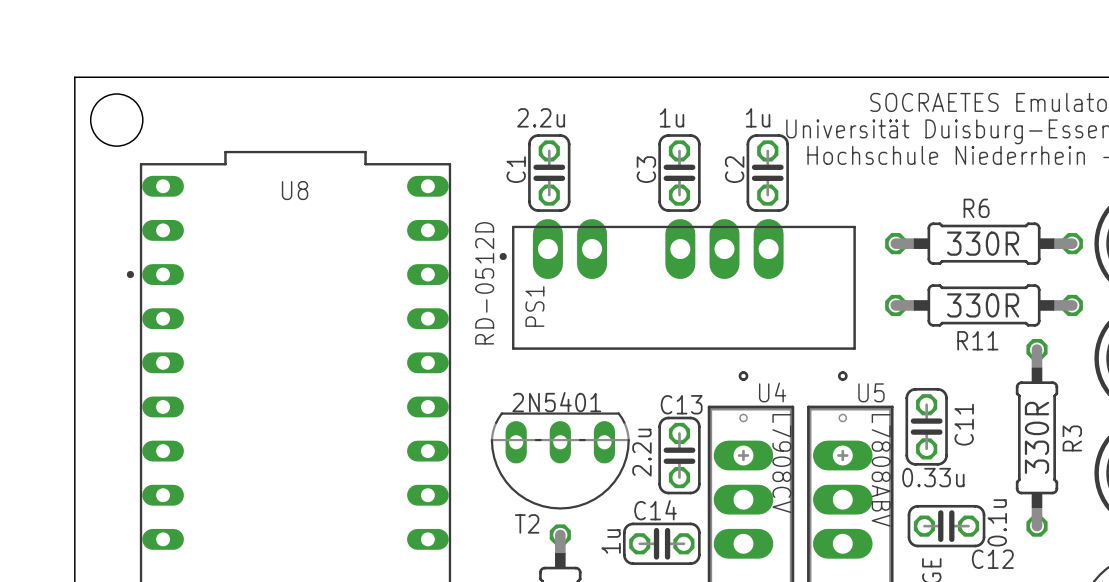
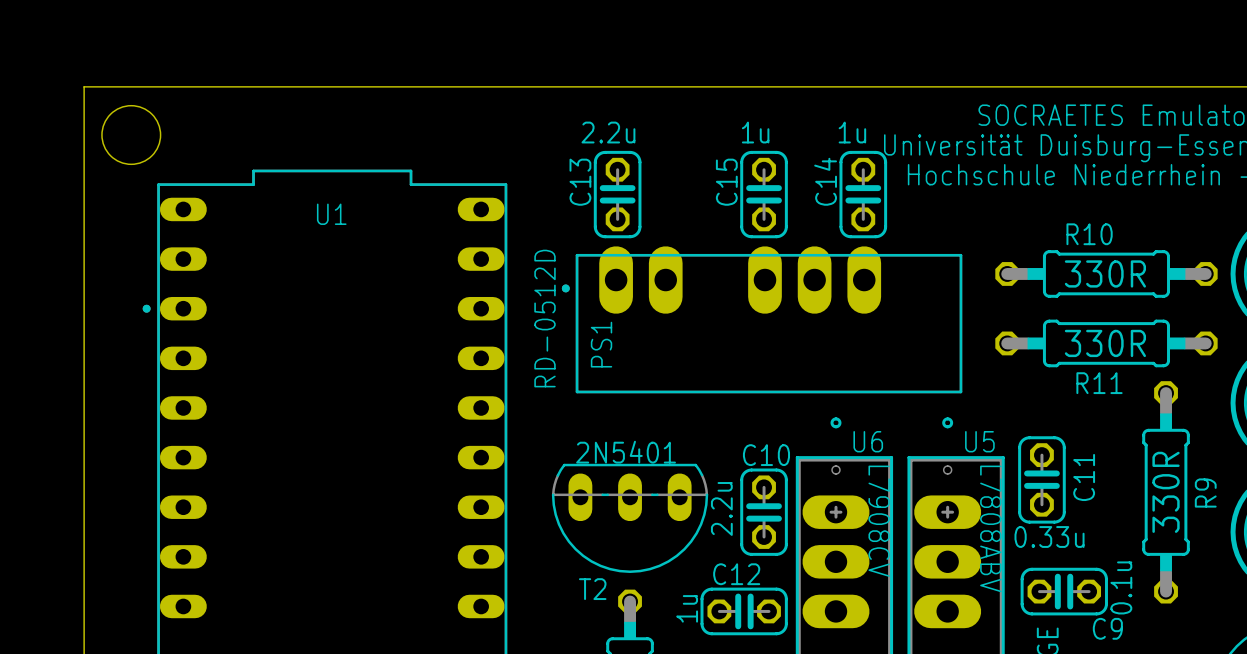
C1 name: C1 (516, 169) -> C13 (580, 182)
C3 name: C3 (646, 169) -> C15 (726, 182)
C2 name: C2 (734, 169) -> C14 (825, 181)
U8 name: U8 (295, 190) -> U1 (331, 214)
R6 name: R6 (976, 208) -> R10 (1089, 234)
U4 name: U4 (772, 392) -> U6 (868, 441)
C13 name: C13 (681, 404) -> C10 (766, 455)
R3 name: R3 (1072, 438) -> R9 (1205, 493)
C14 name: C14 (655, 510) -> C12 (736, 574)
C12 name: C12 (992, 559) -> C9 (1107, 628)

